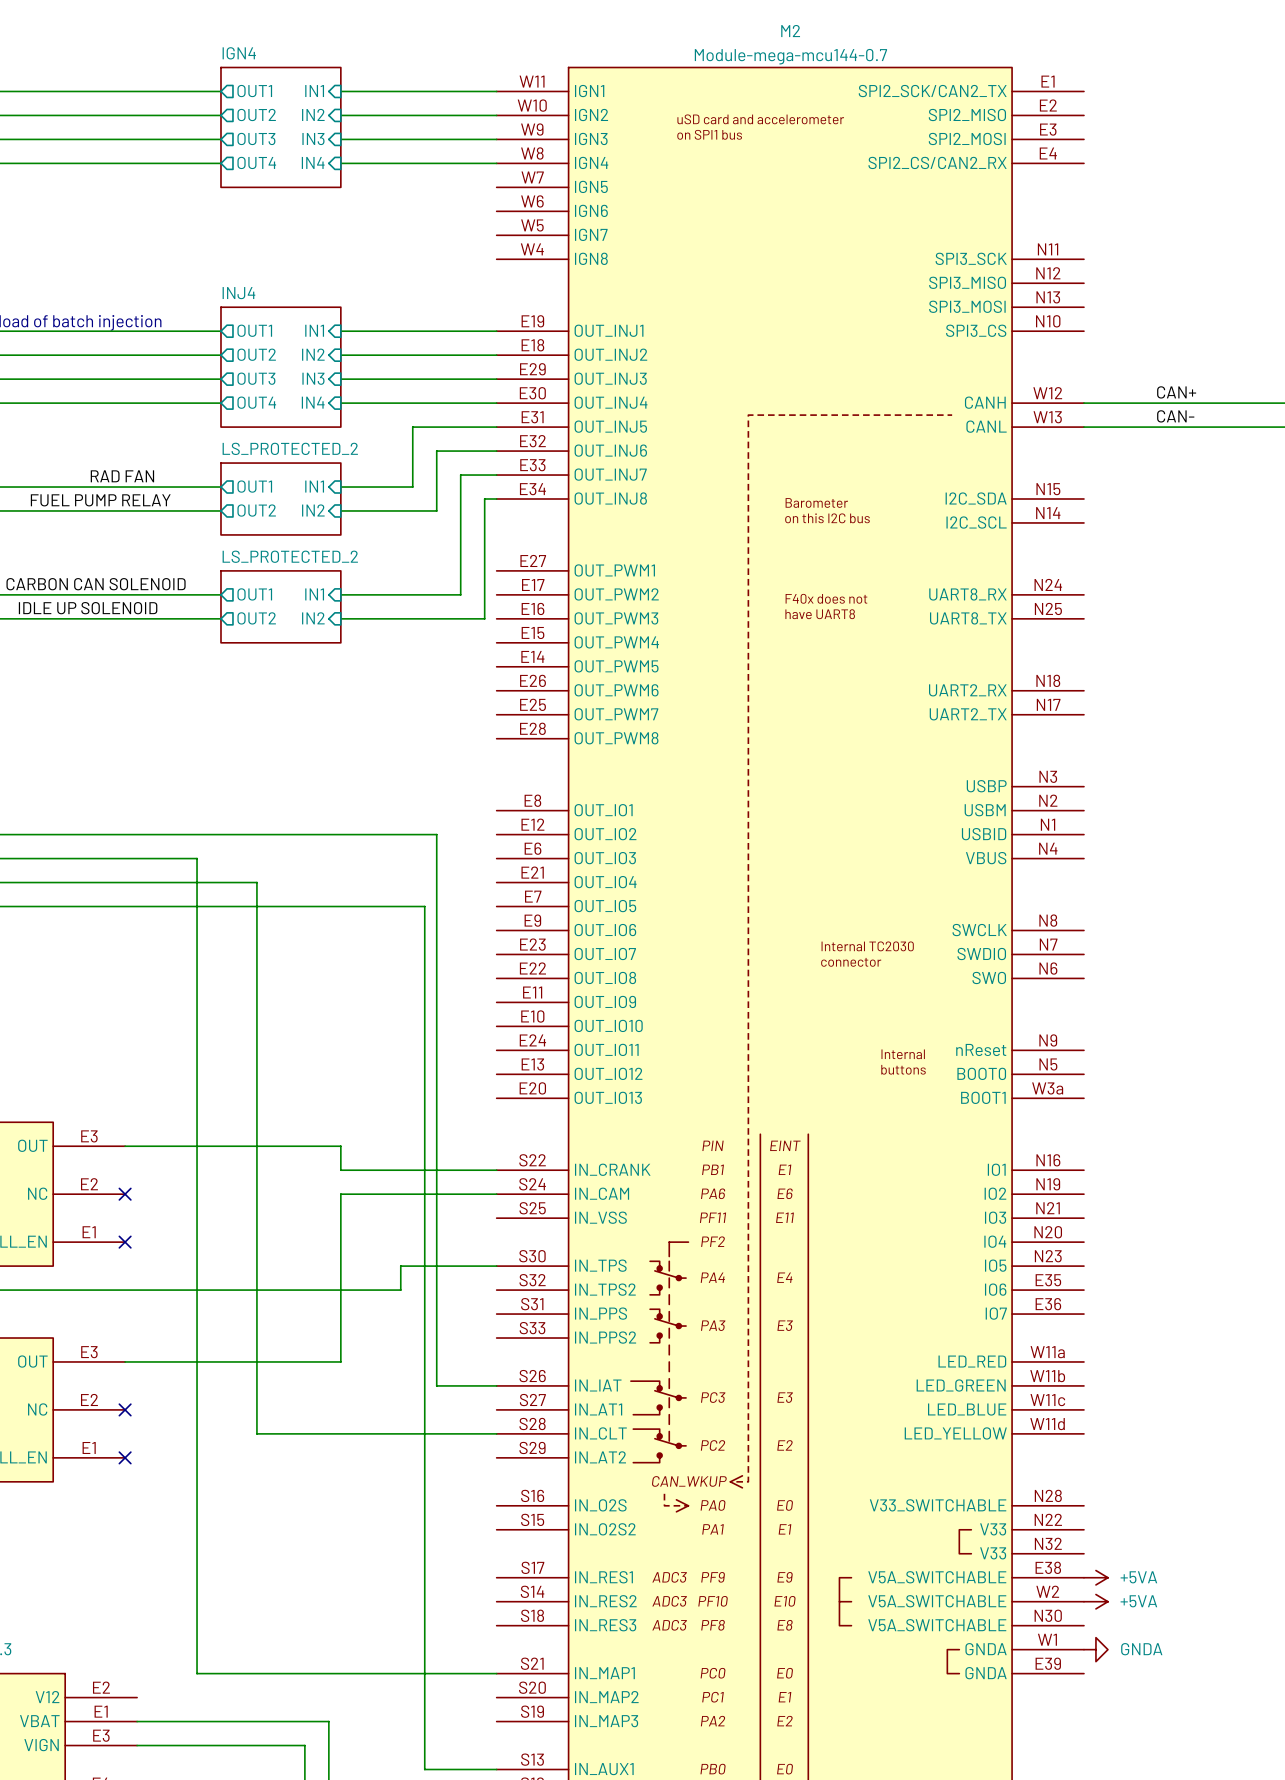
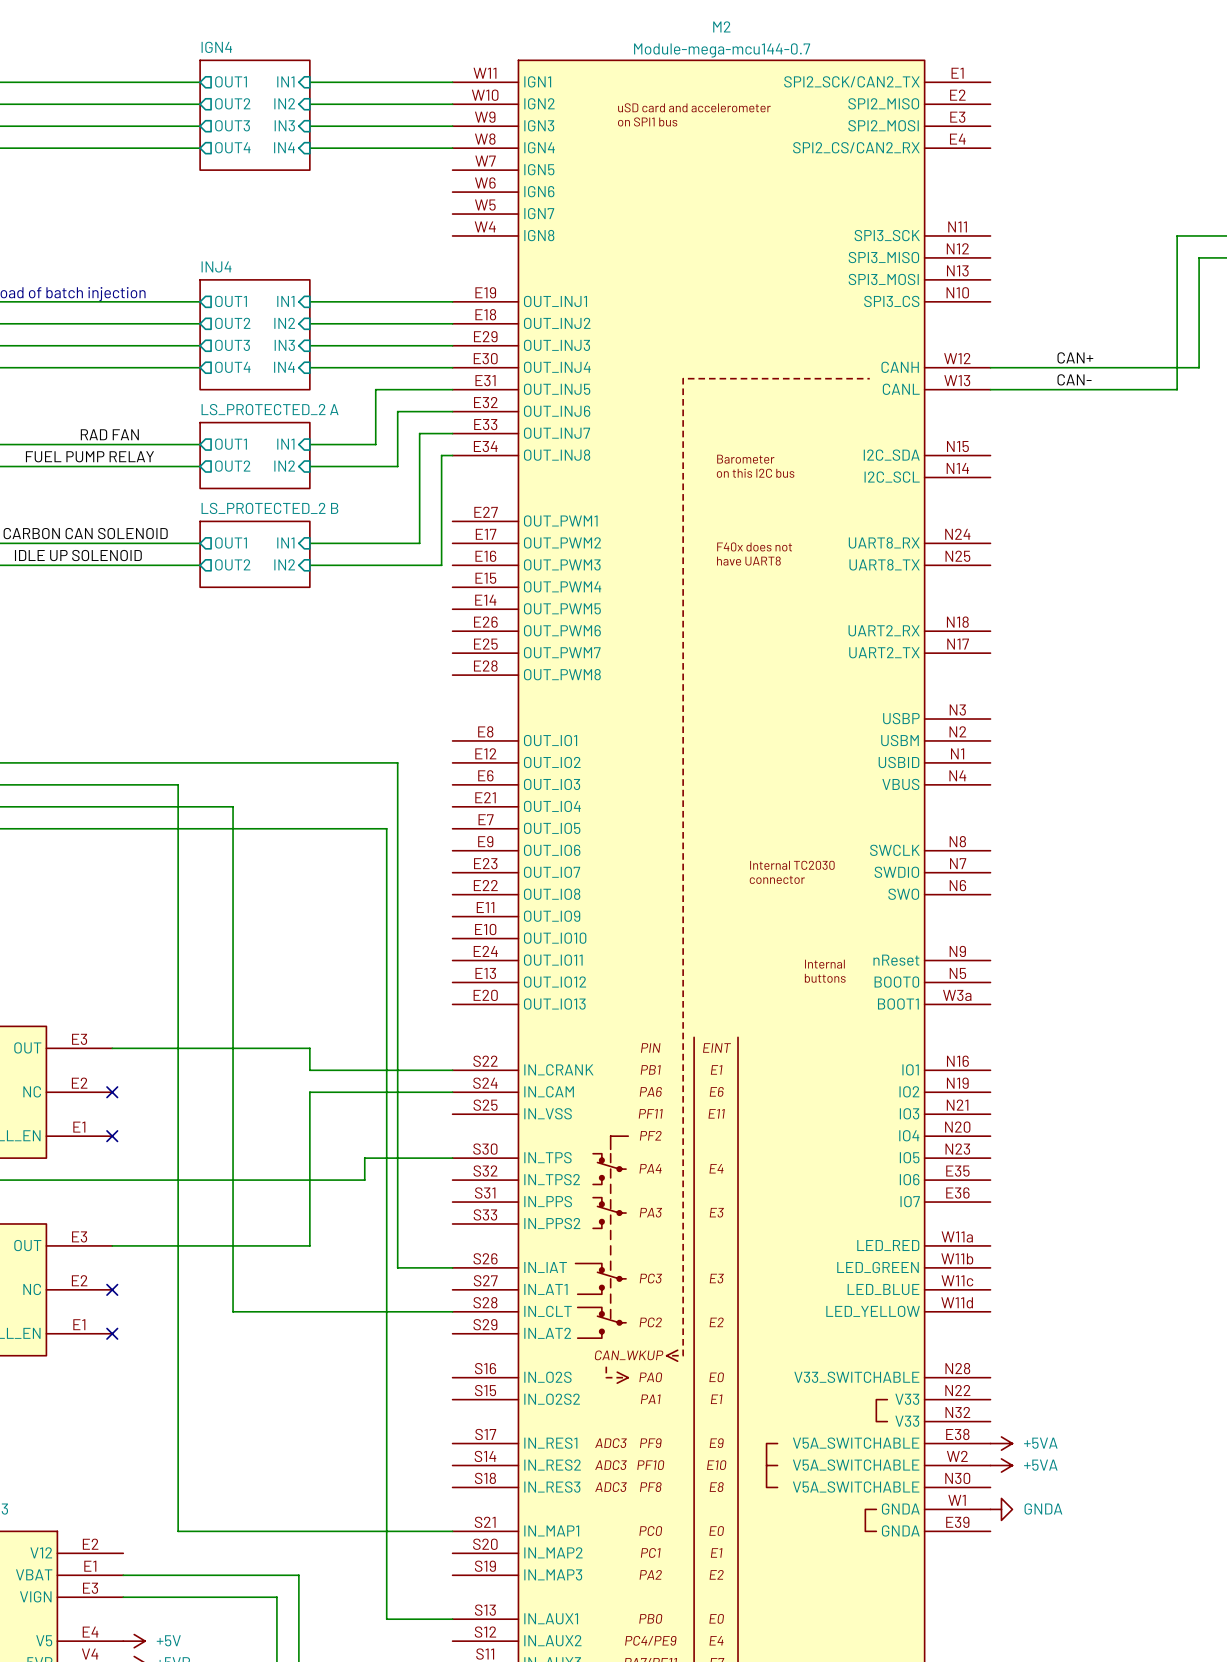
sheet LS_PROTECTED_2 name: LS_PROTECTED_2 (290, 448) -> LS_PROTECTED_2 A (270, 409)
sheet LS_PROTECTED_2 name: LS_PROTECTED_2 (290, 556) -> LS_PROTECTED_2 B (269, 508)

